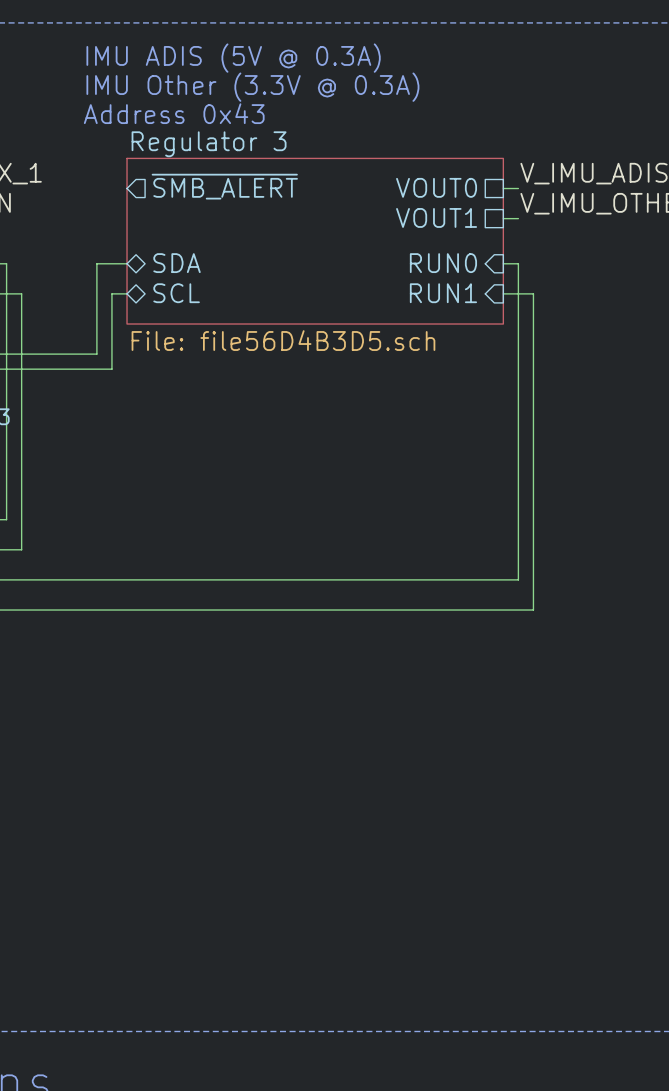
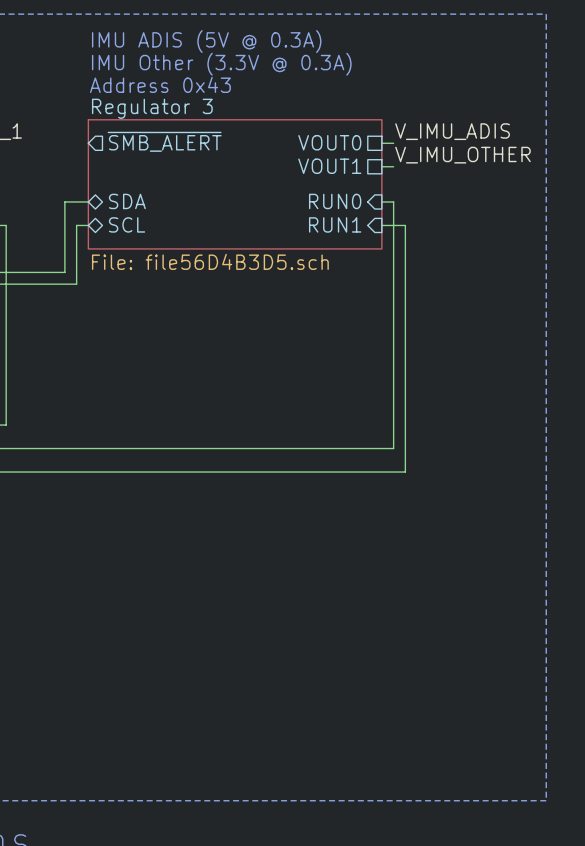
text position: IMU ADIS (5V @ 0.3A) (233, 58) -> IMU ADIS (5V @ 0.3A) (206, 41)
text position: IMU Other (3.3V @ 0.3A) (252, 87) -> IMU Other (3.3V @ 0.3A) (221, 64)
text position: Address 0x43 (174, 113) -> Address 0x43 (160, 84)

